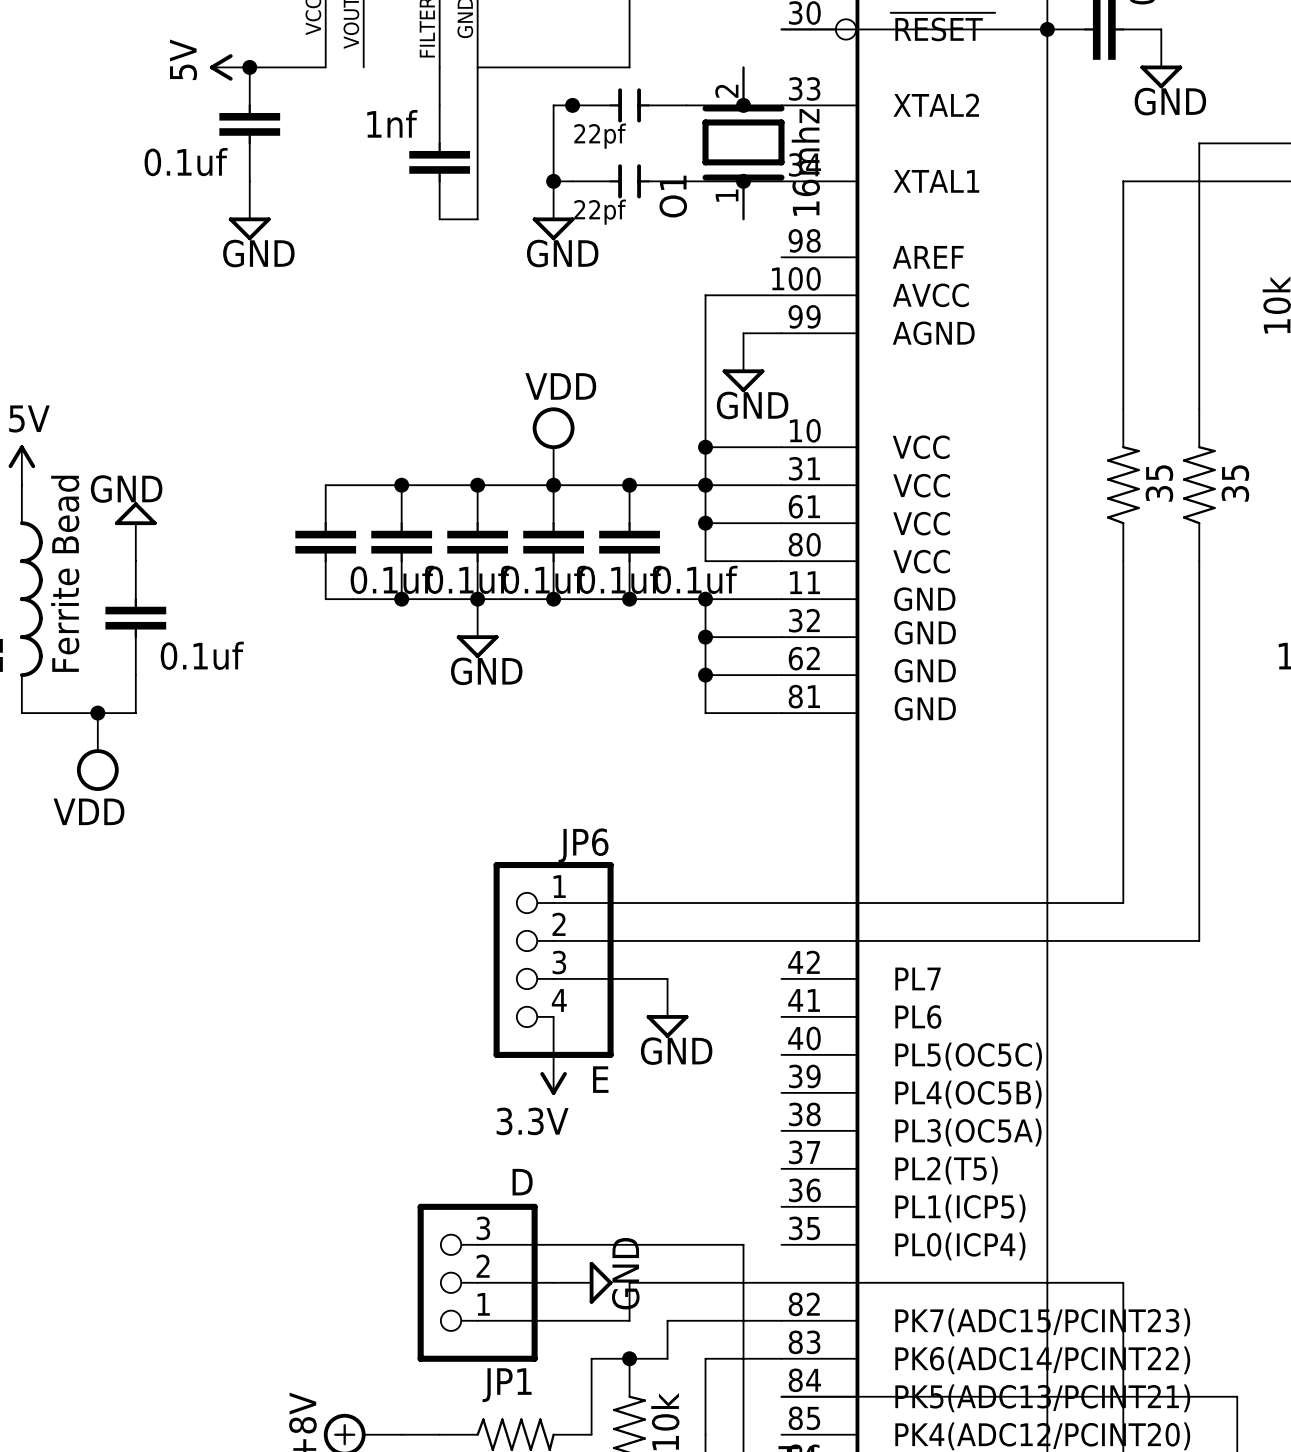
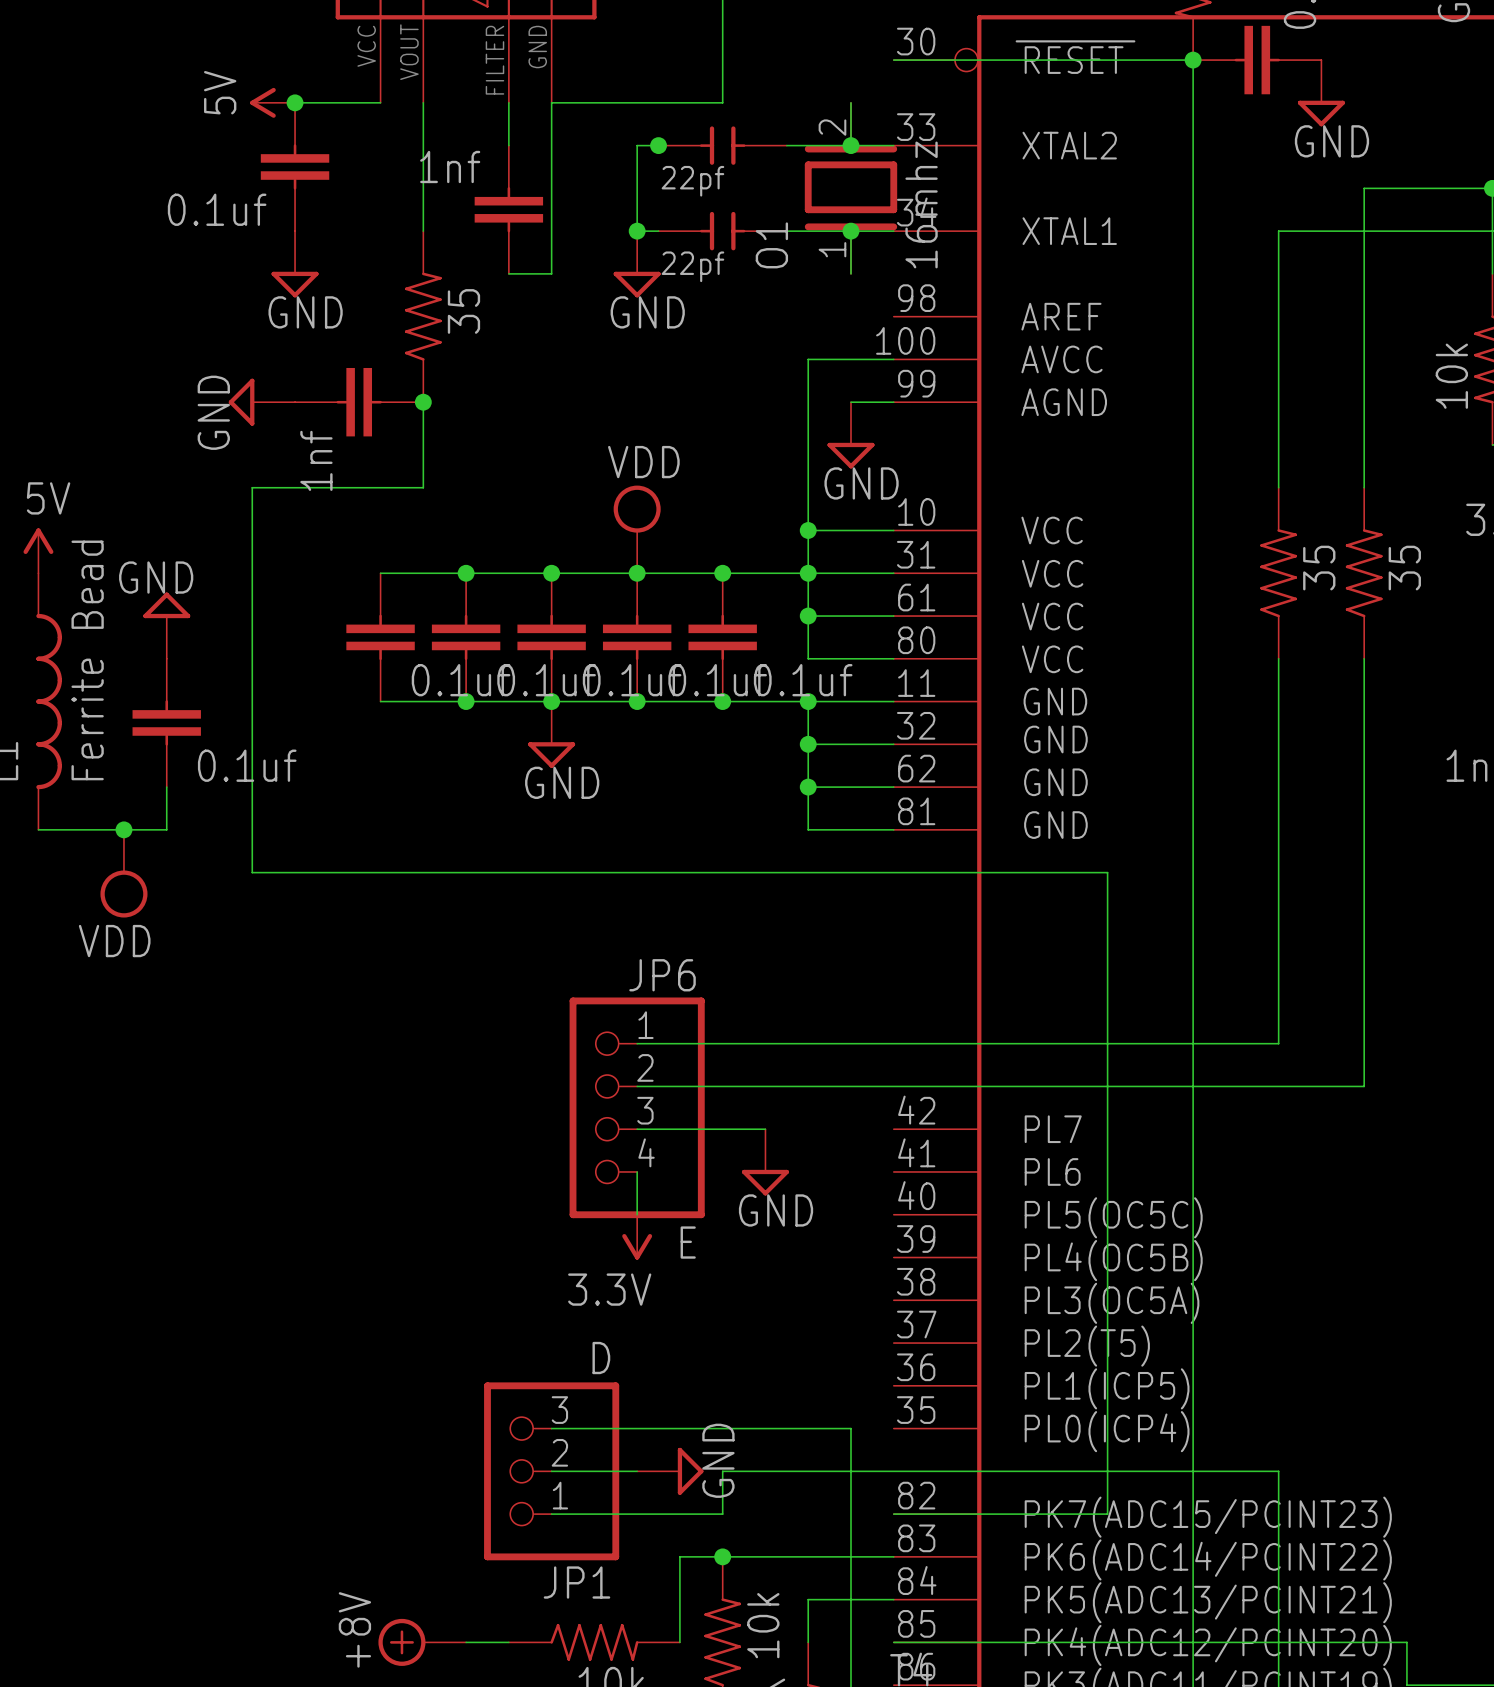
wire: none -> (423, 102) (423, 231)
part: none -> 35 (423, 316)
power symbol: none -> GND (261, 402)
part: none -> 1nf (359, 402)
junction: none -> (423, 402)
wire: (781, 1320) (667, 1320) (667, 1358) -> (893, 1514) (1107, 1514) (1107, 872) (252, 872) (252, 487) (423, 487) (423, 402)
wire: (705, 1358) (705, 1396) -> (808, 1556) (765, 1556)
wire: none -> (808, 1599) (893, 1599)
wire: (781, 1396) (1237, 1396) (1237, 1434) -> (893, 1642) (1406, 1642)

